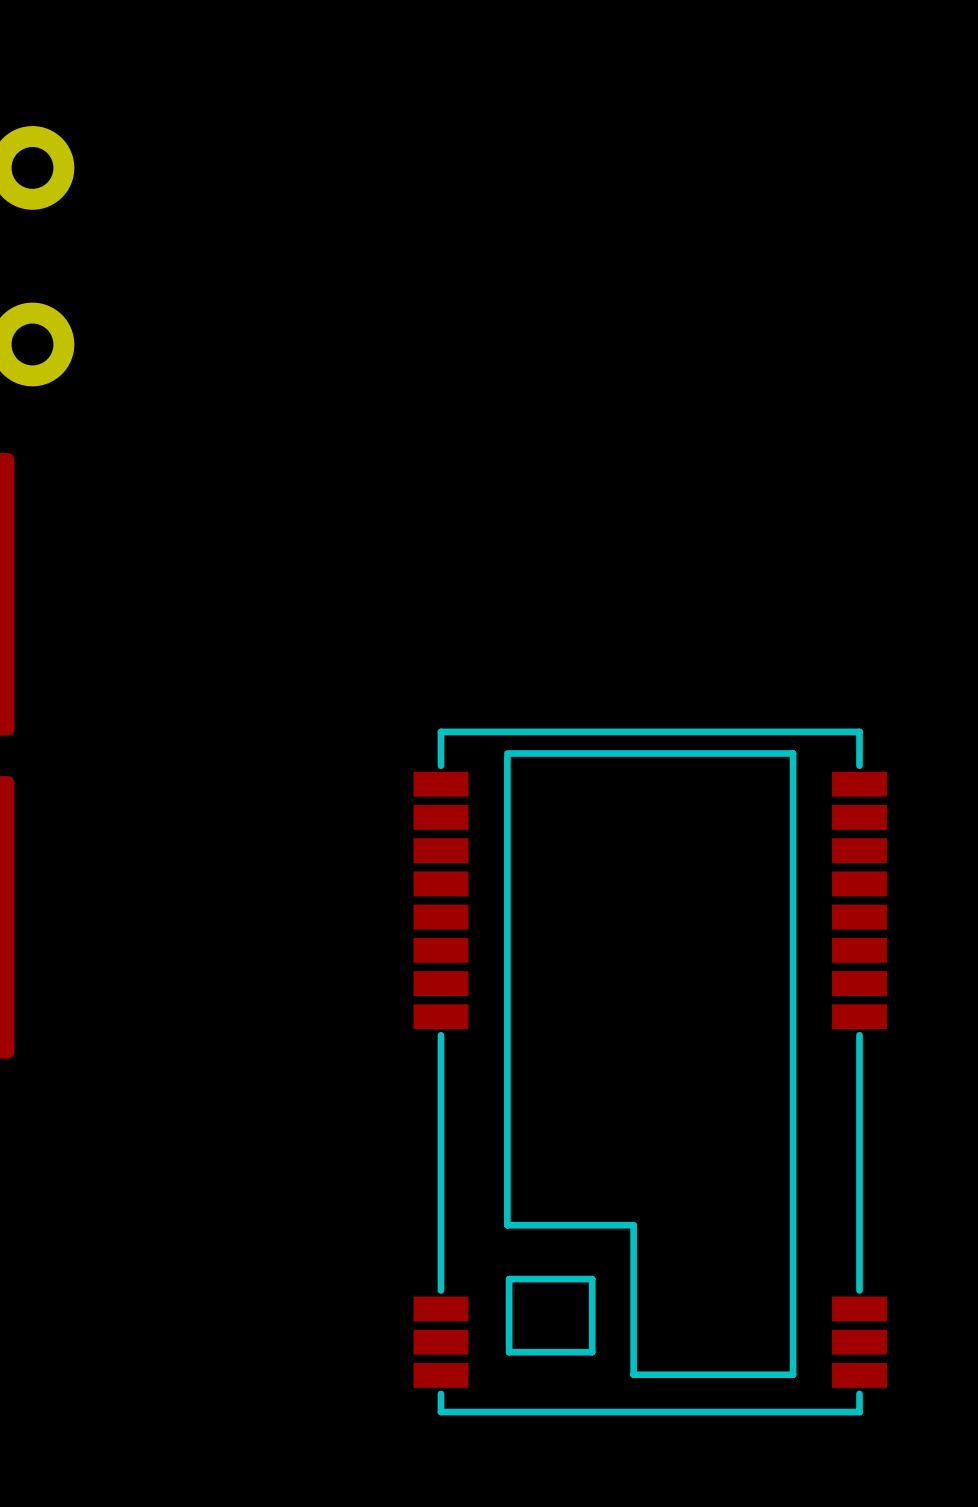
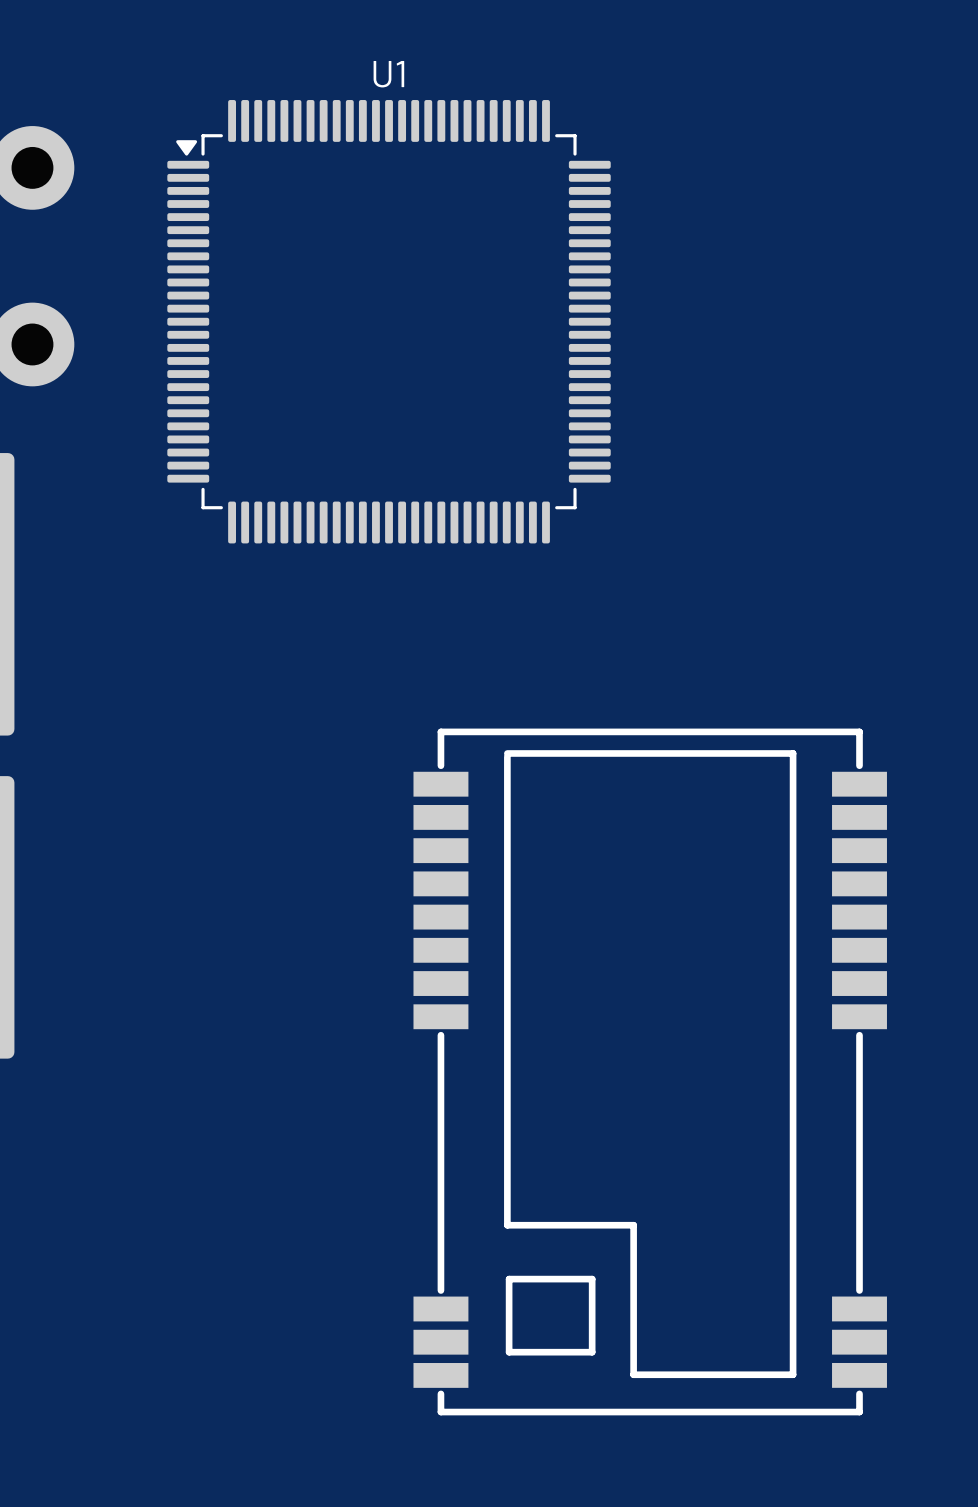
U1: none -> (389, 321)

